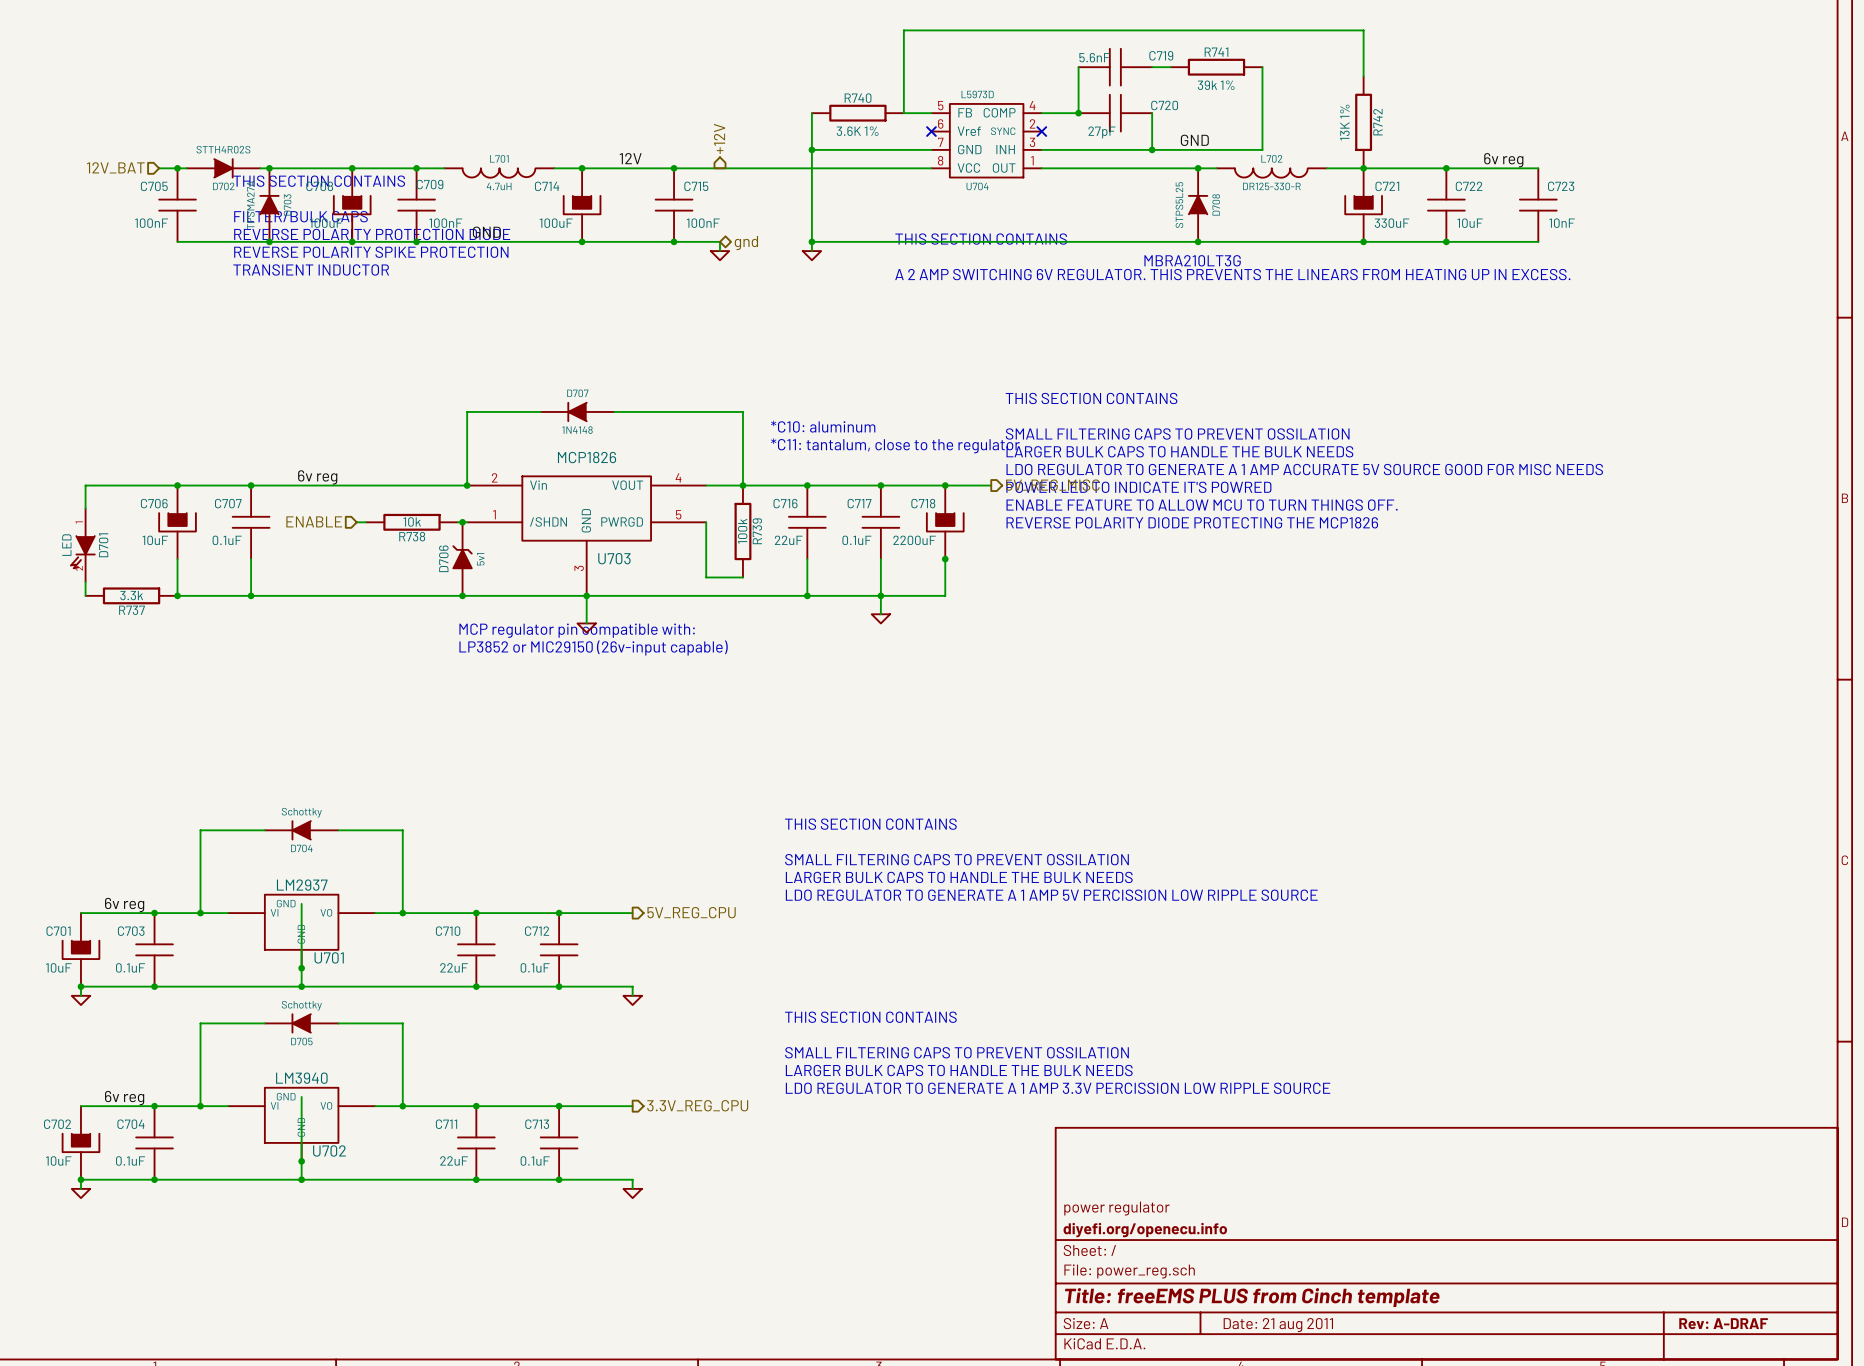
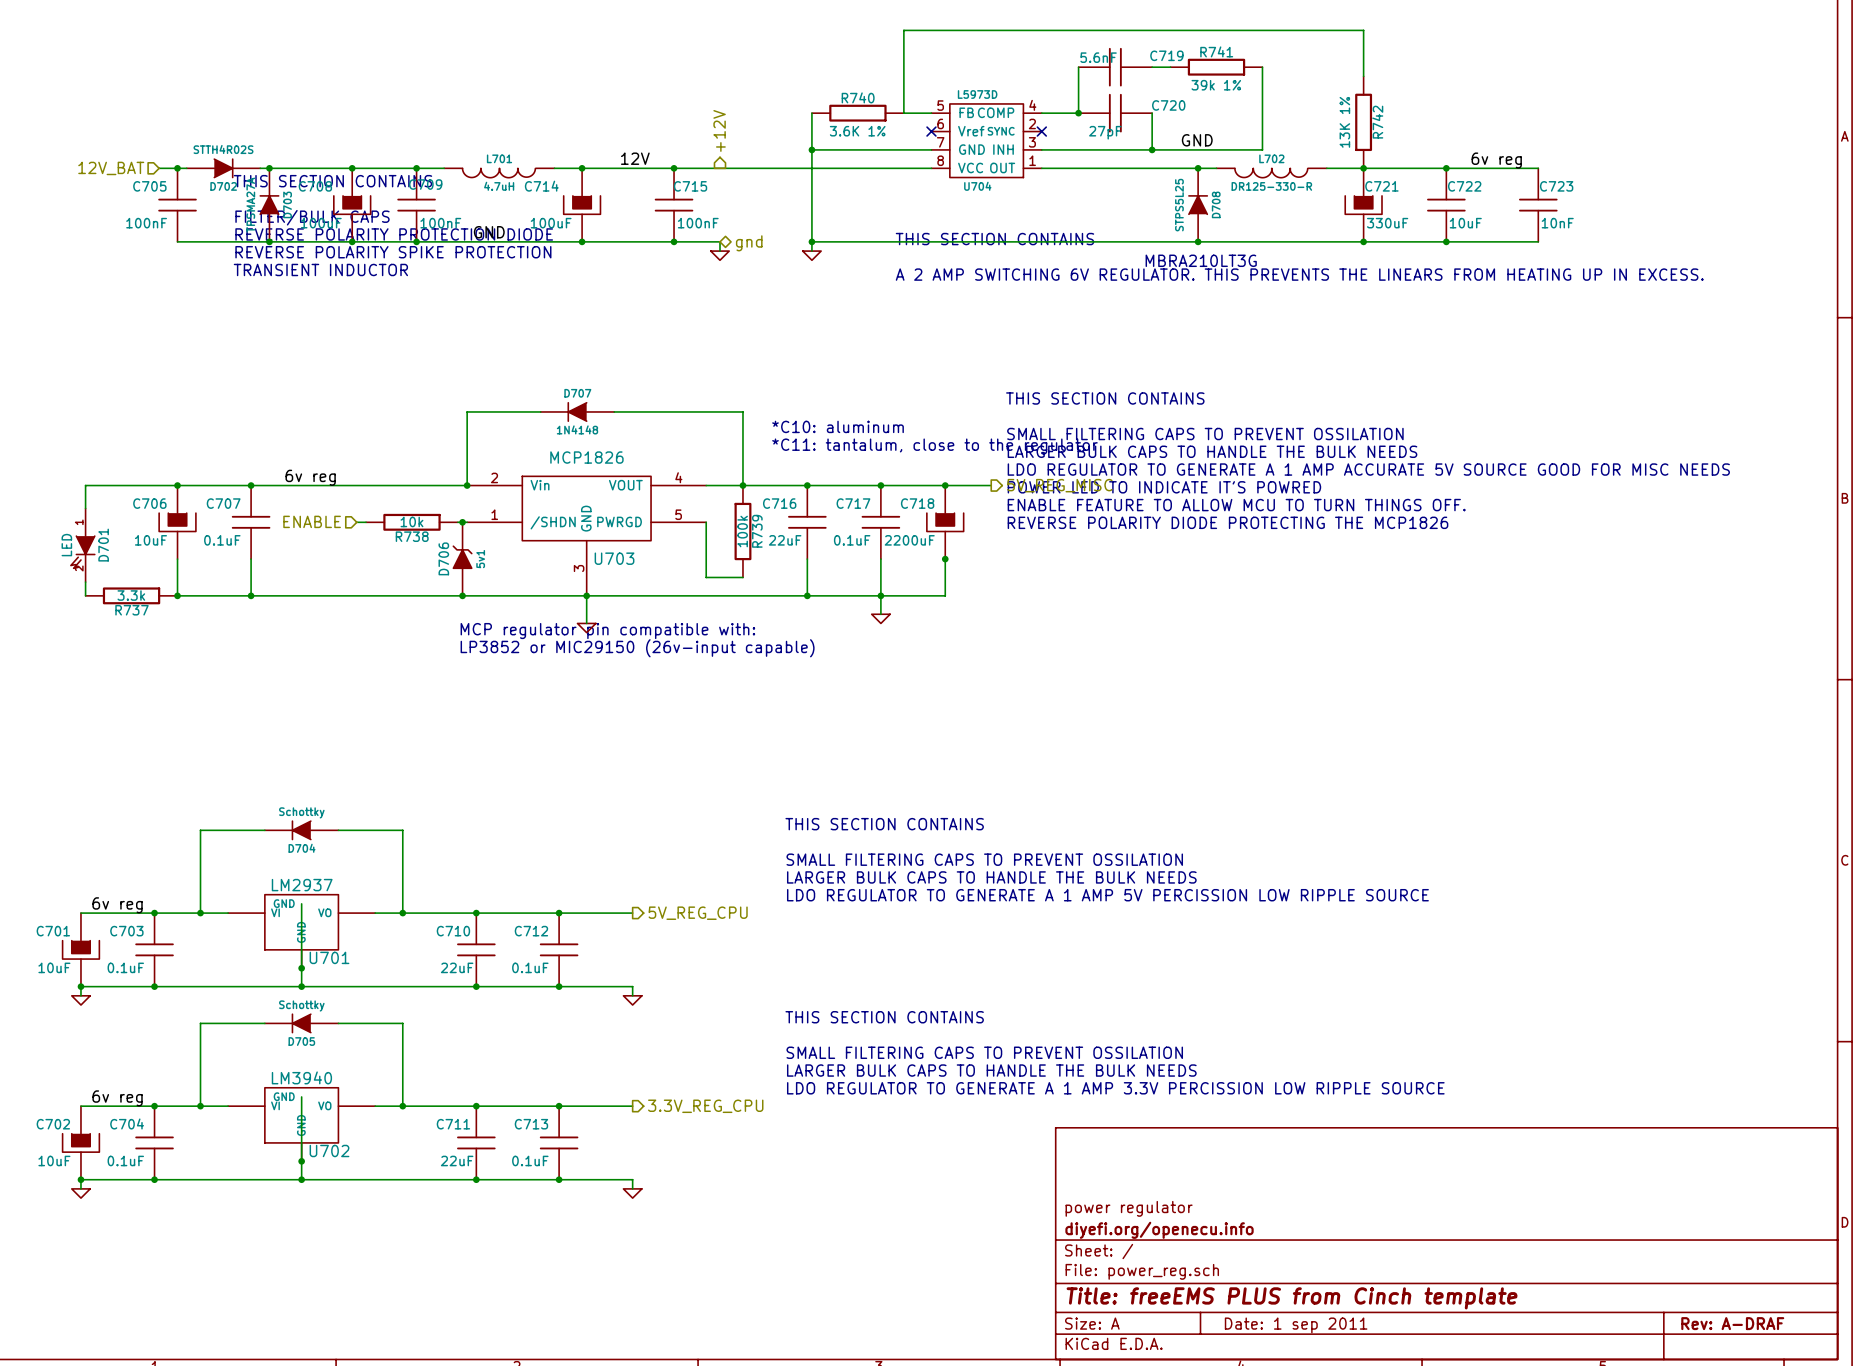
title block: Date: 21 aug 2011 (1278, 1325) -> Date: 1 sep 2011 (1296, 1325)

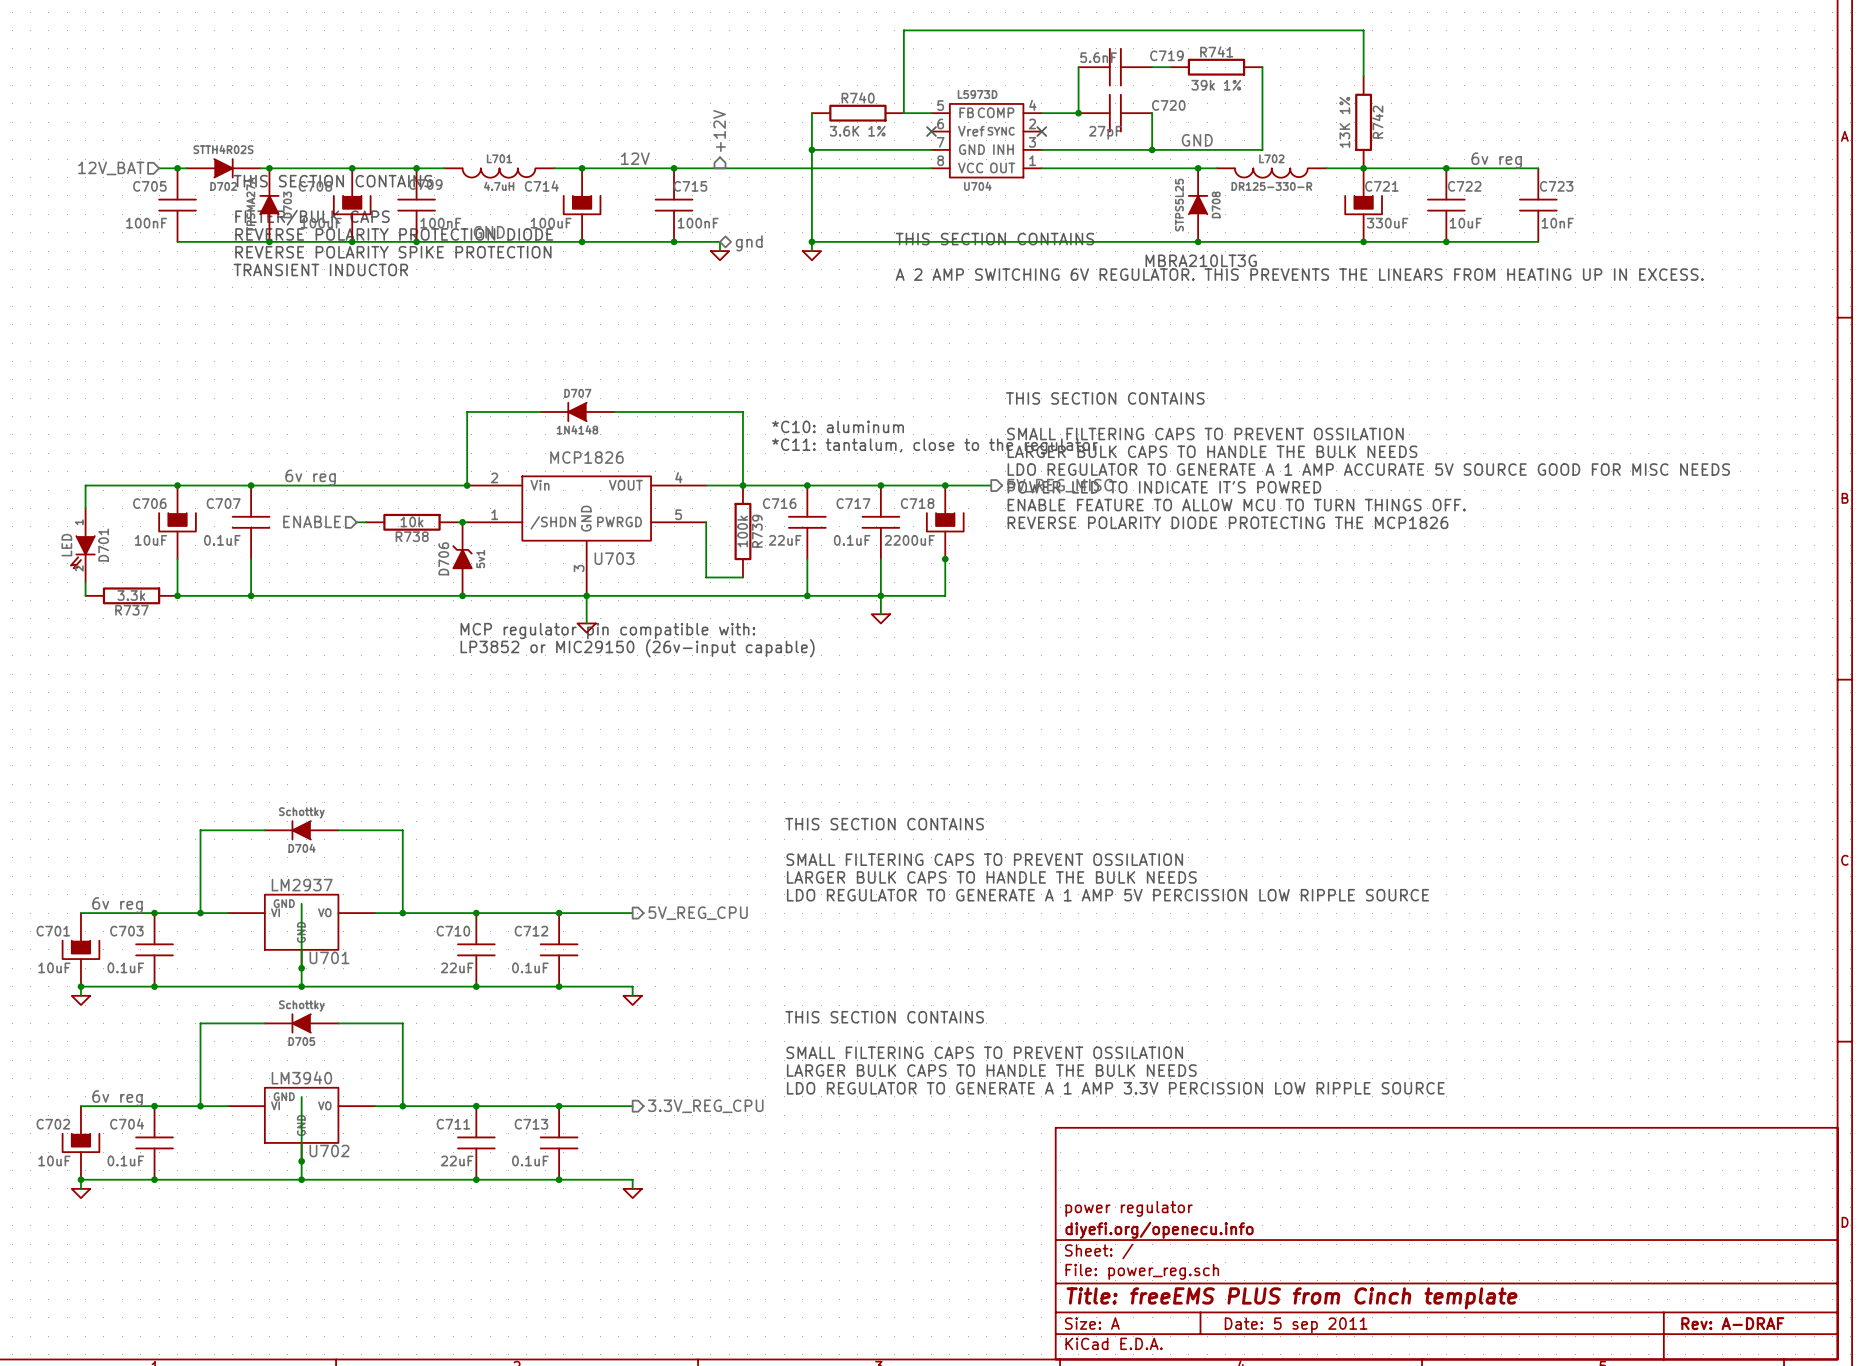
title block: Date: 1 sep 2011 (1296, 1325) -> Date: 5 sep 2011 (1296, 1325)

